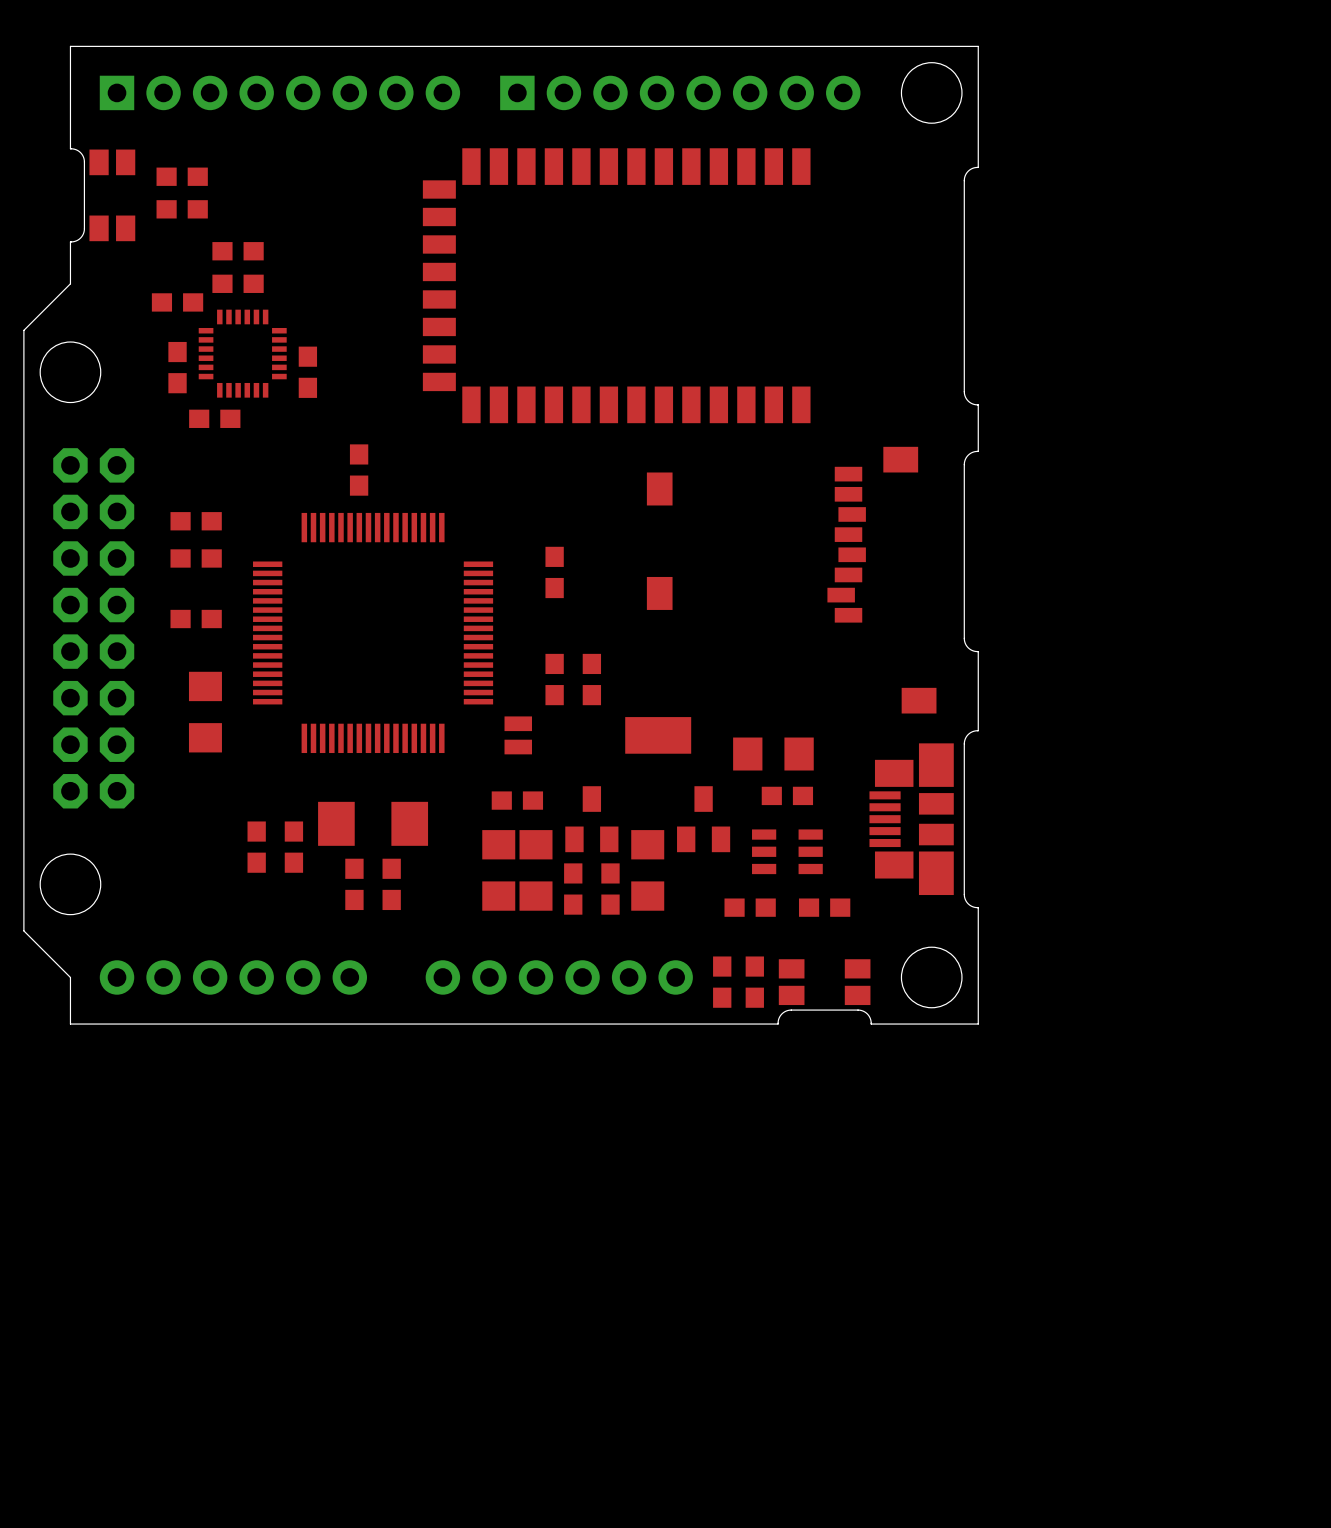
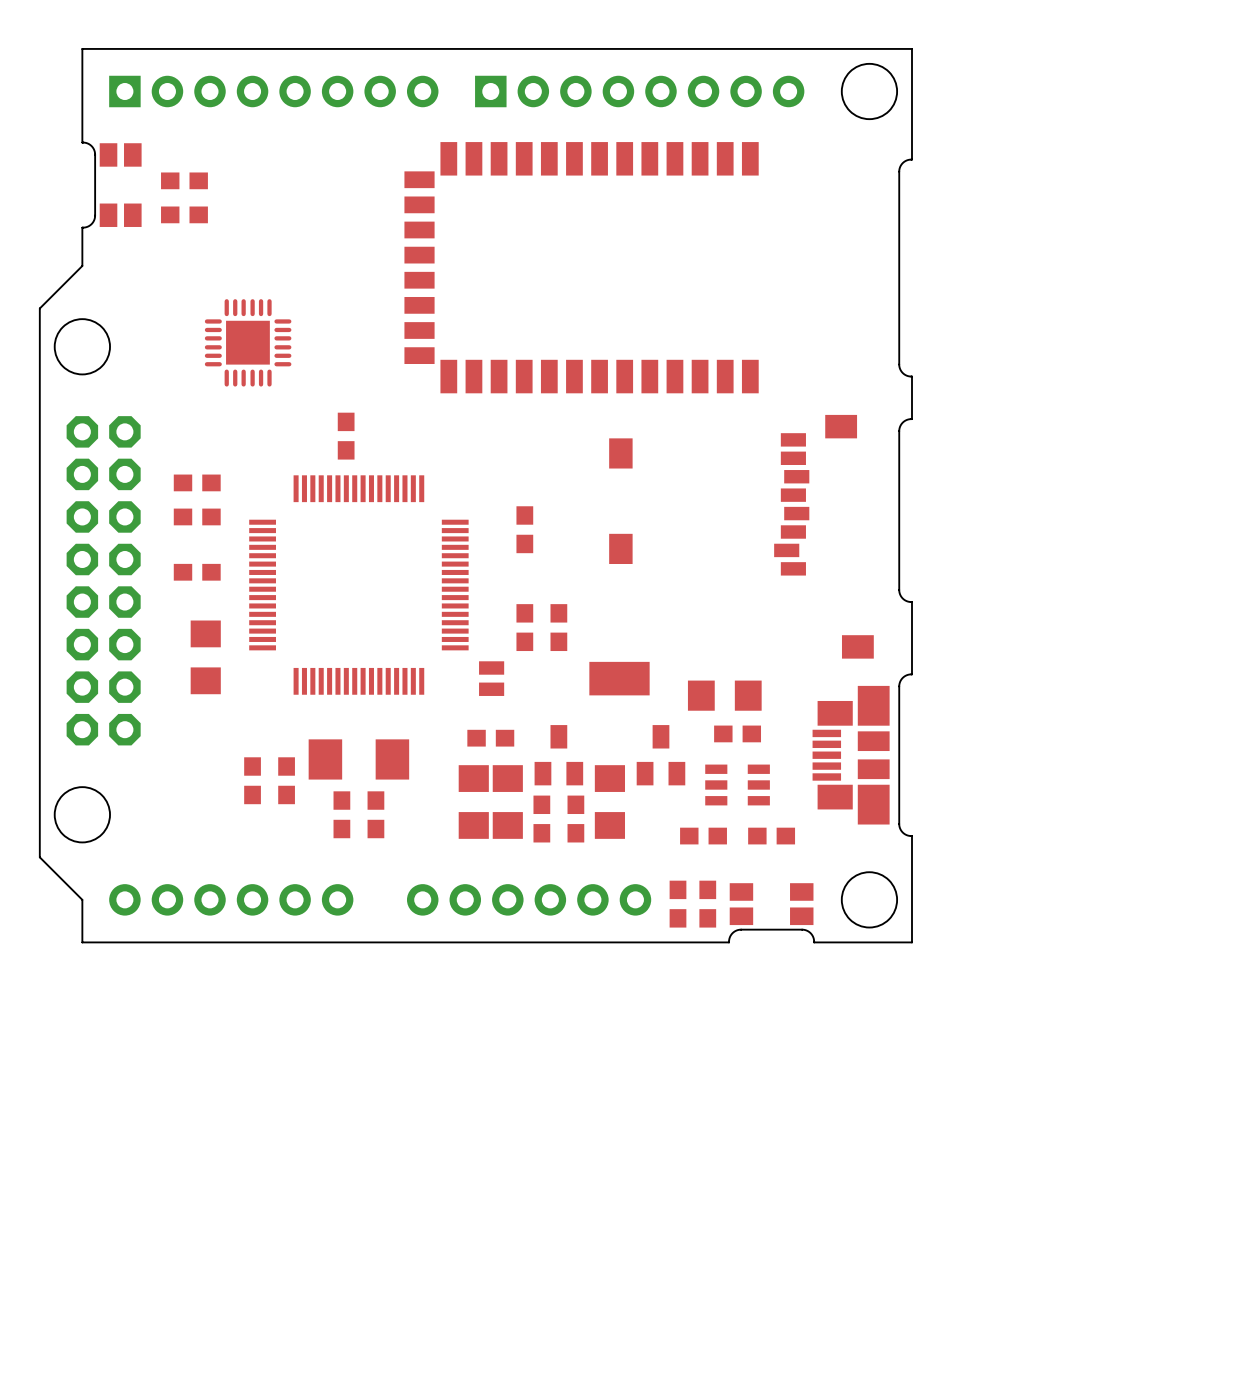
part: (182, 176) -> none
part: none -> (184, 180)
part: (182, 209) -> none
part: none -> (184, 214)
part: (238, 251) -> none
part: (238, 283) -> none
part: (177, 302) -> none
part footprint: [198, 309, 287, 398] -> [204, 299, 292, 387]
part: (177, 367) -> none
part: (307, 372) -> none
part: (214, 418) -> none

